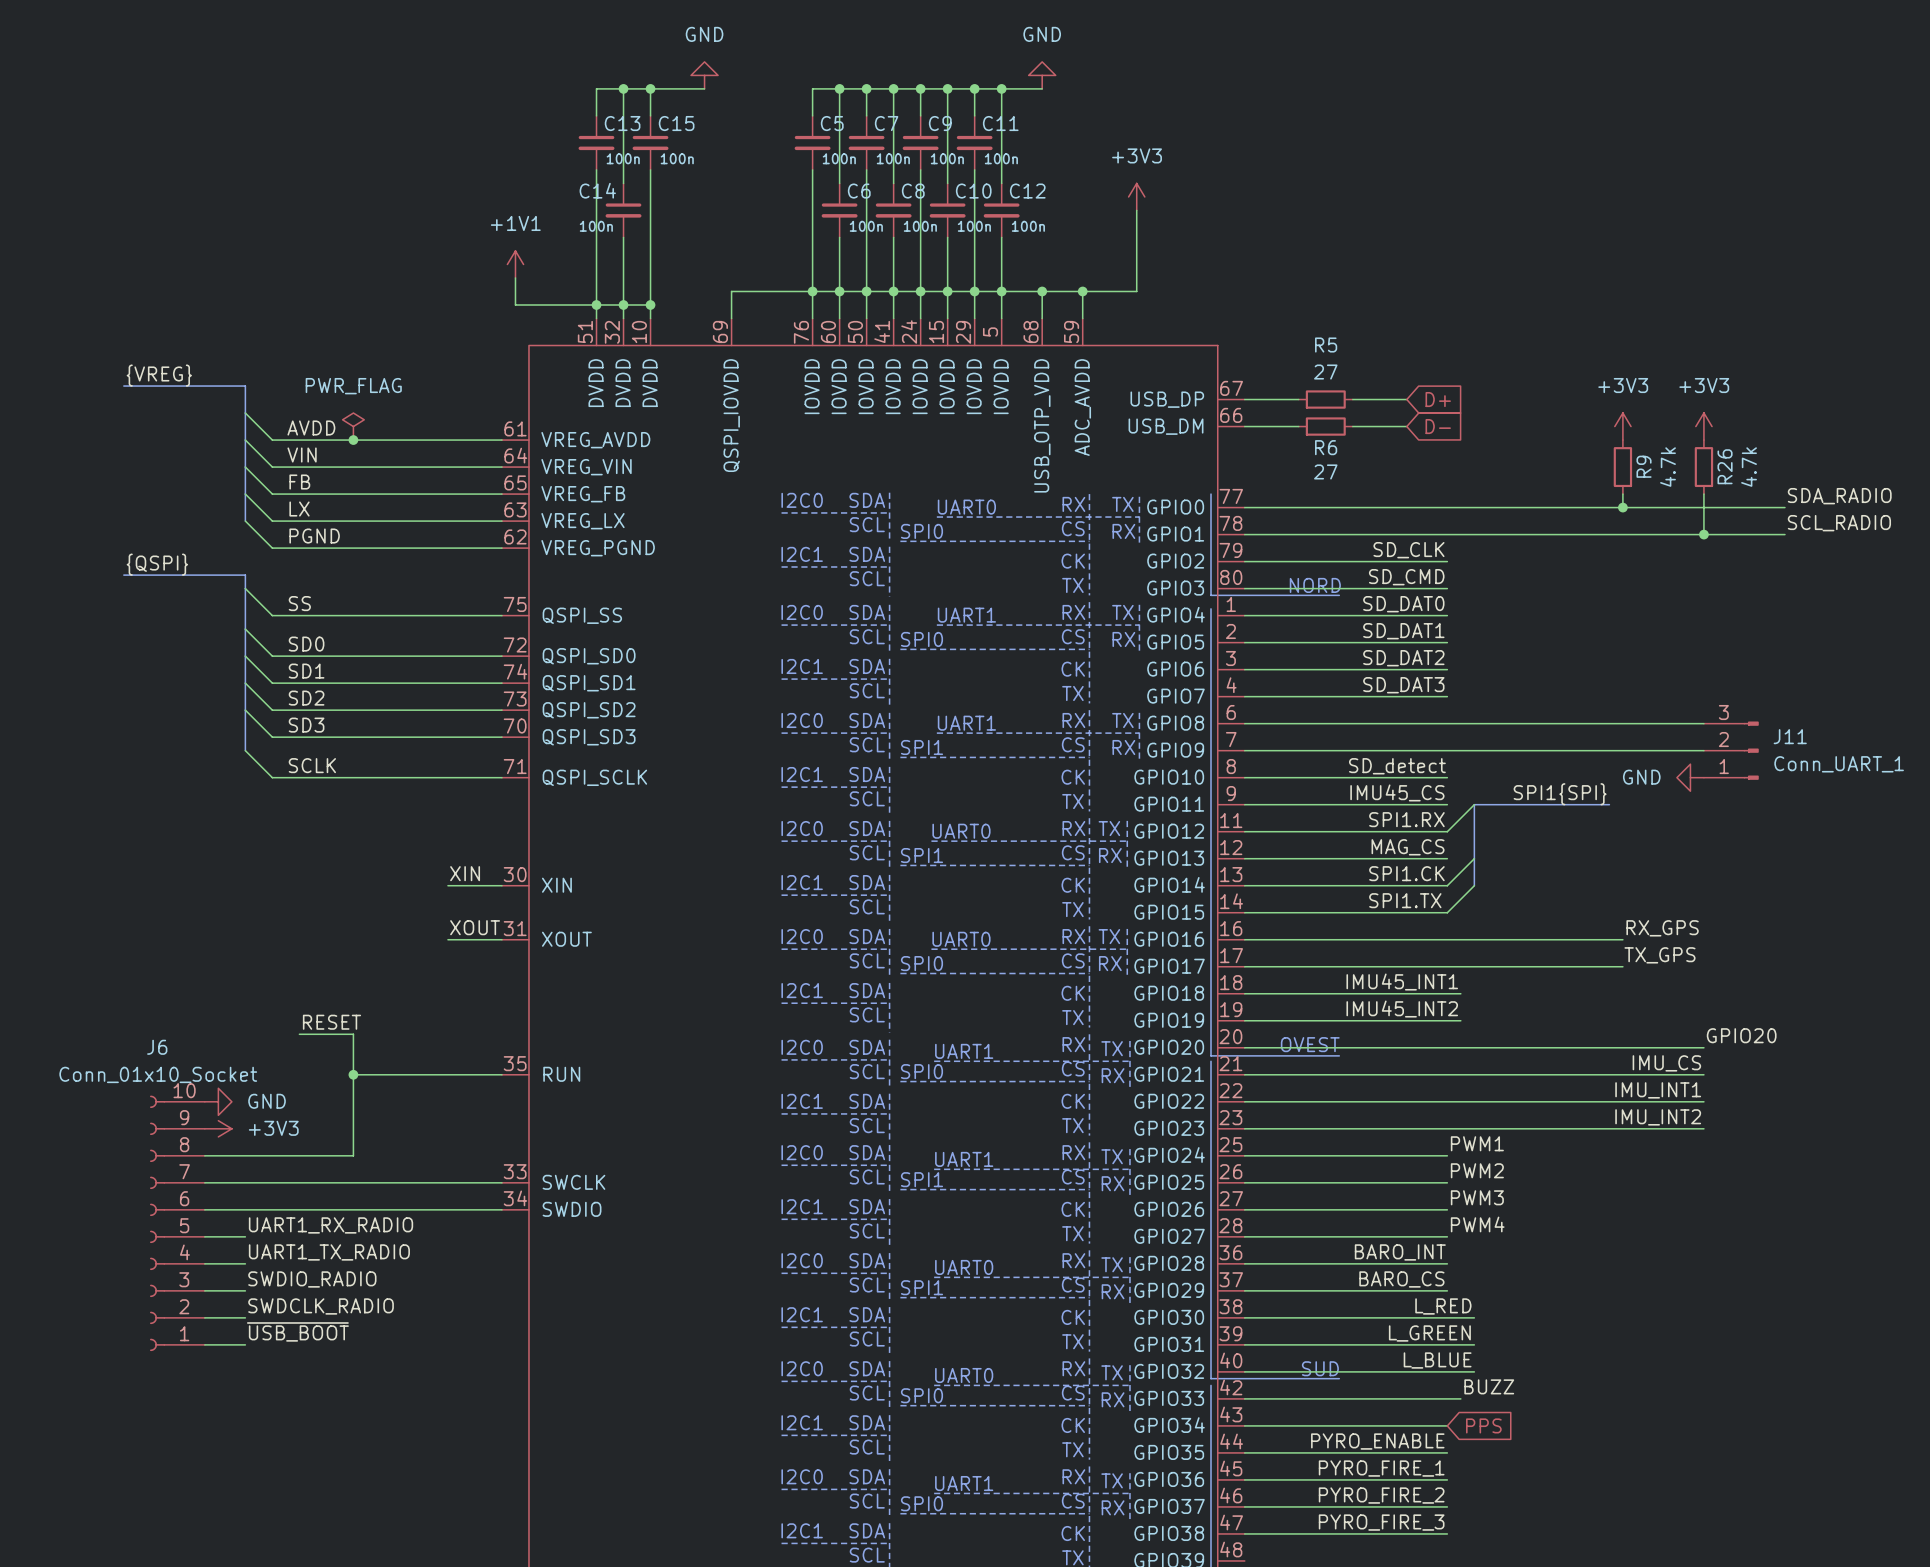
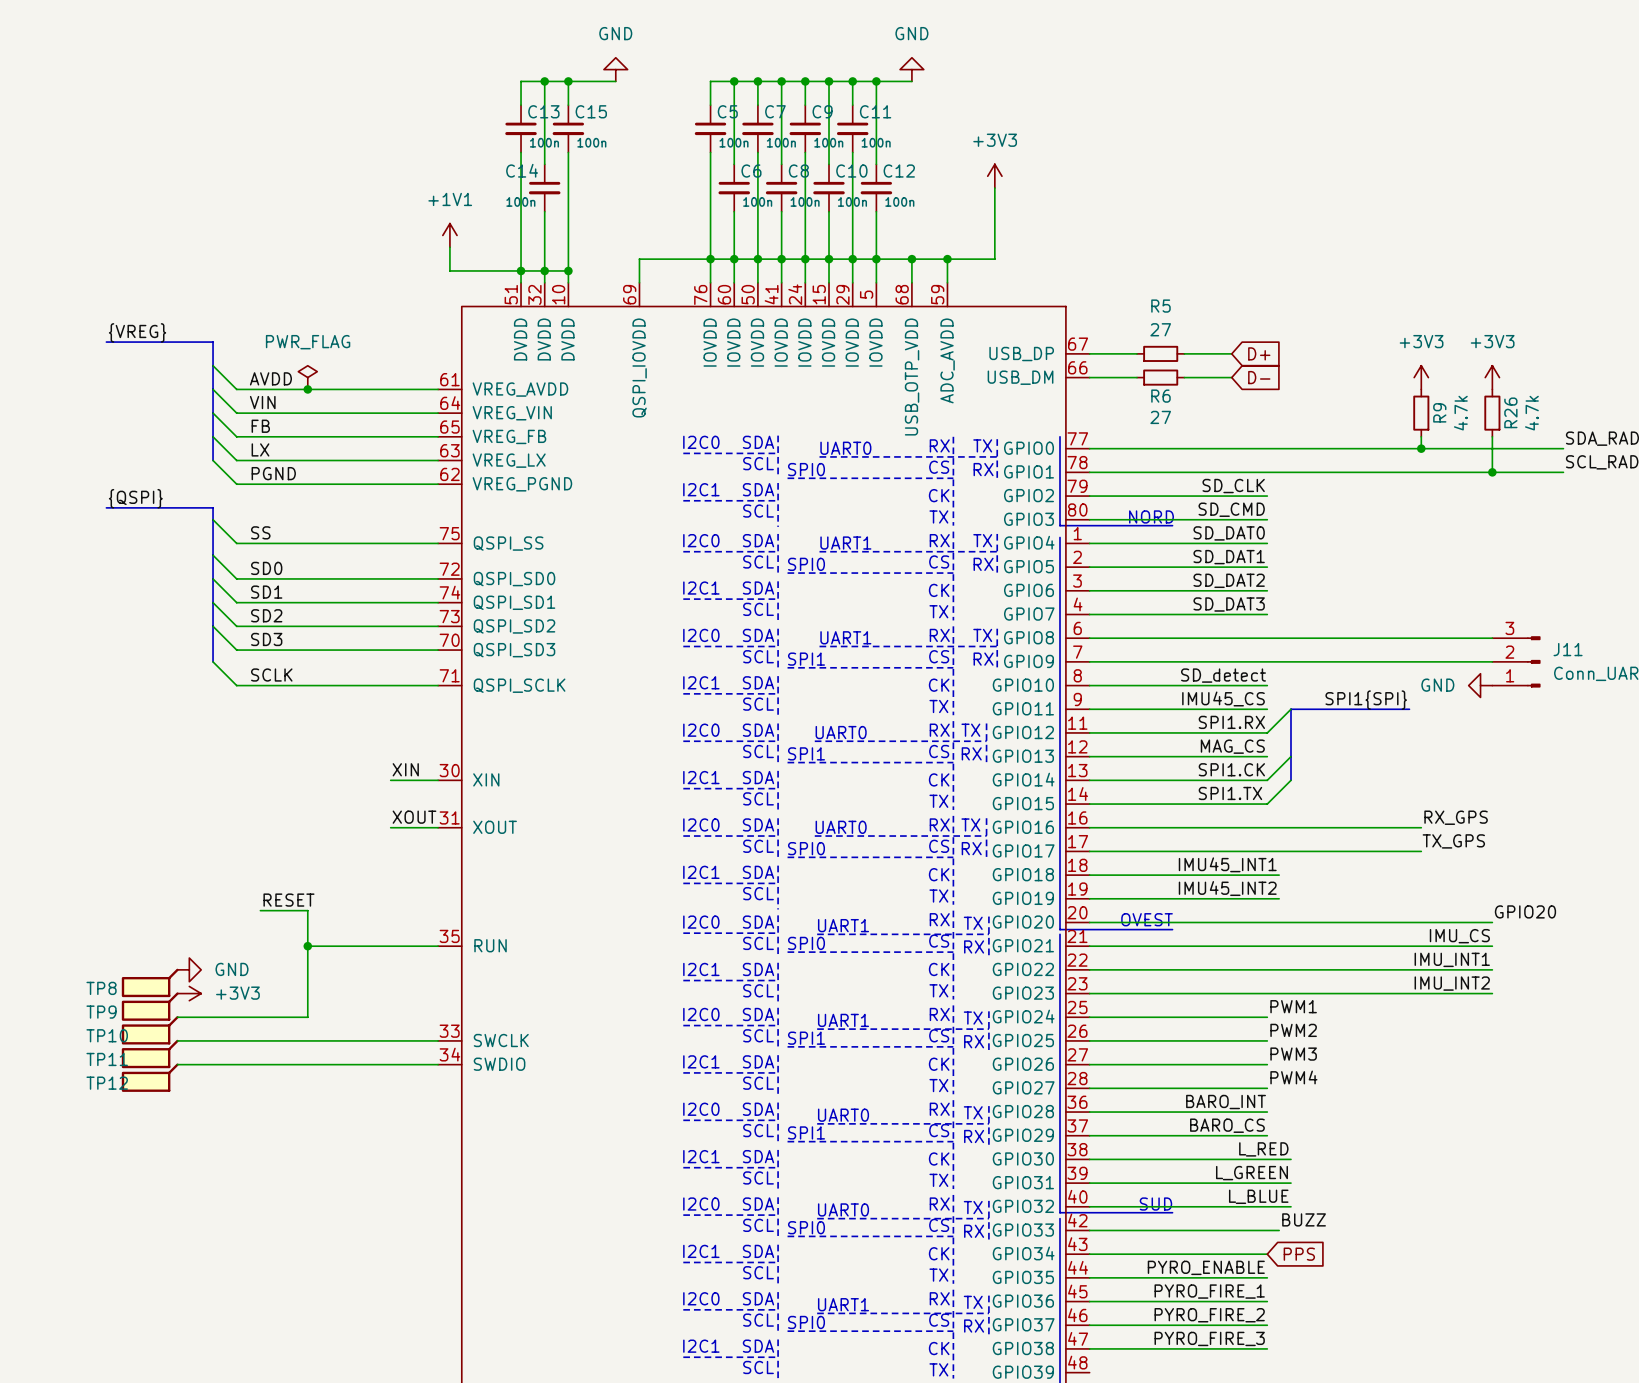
TP8: none -> (150, 982)
TP9: none -> (150, 1006)
TP10: none -> (150, 1030)
TP11: none -> (150, 1053)
J6: Conn_01x10_Socket (177, 1223) -> none
TP12: none -> (150, 1077)
label: UART1_RX_RADIO (331, 1225) -> none
wire: (204, 1236) (245, 1236) -> none
label: UART1_TX_RADIO (329, 1252) -> none
wire: (204, 1263) (245, 1263) -> none
label: SWDIO_RADIO (312, 1279) -> none
wire: (204, 1290) (245, 1290) -> none
label: SWDCLK_RADIO (321, 1306) -> none
wire: (204, 1317) (245, 1317) -> none
label: ~{USB_BOOT} (297, 1331) -> none
wire: (204, 1344) (245, 1344) -> none

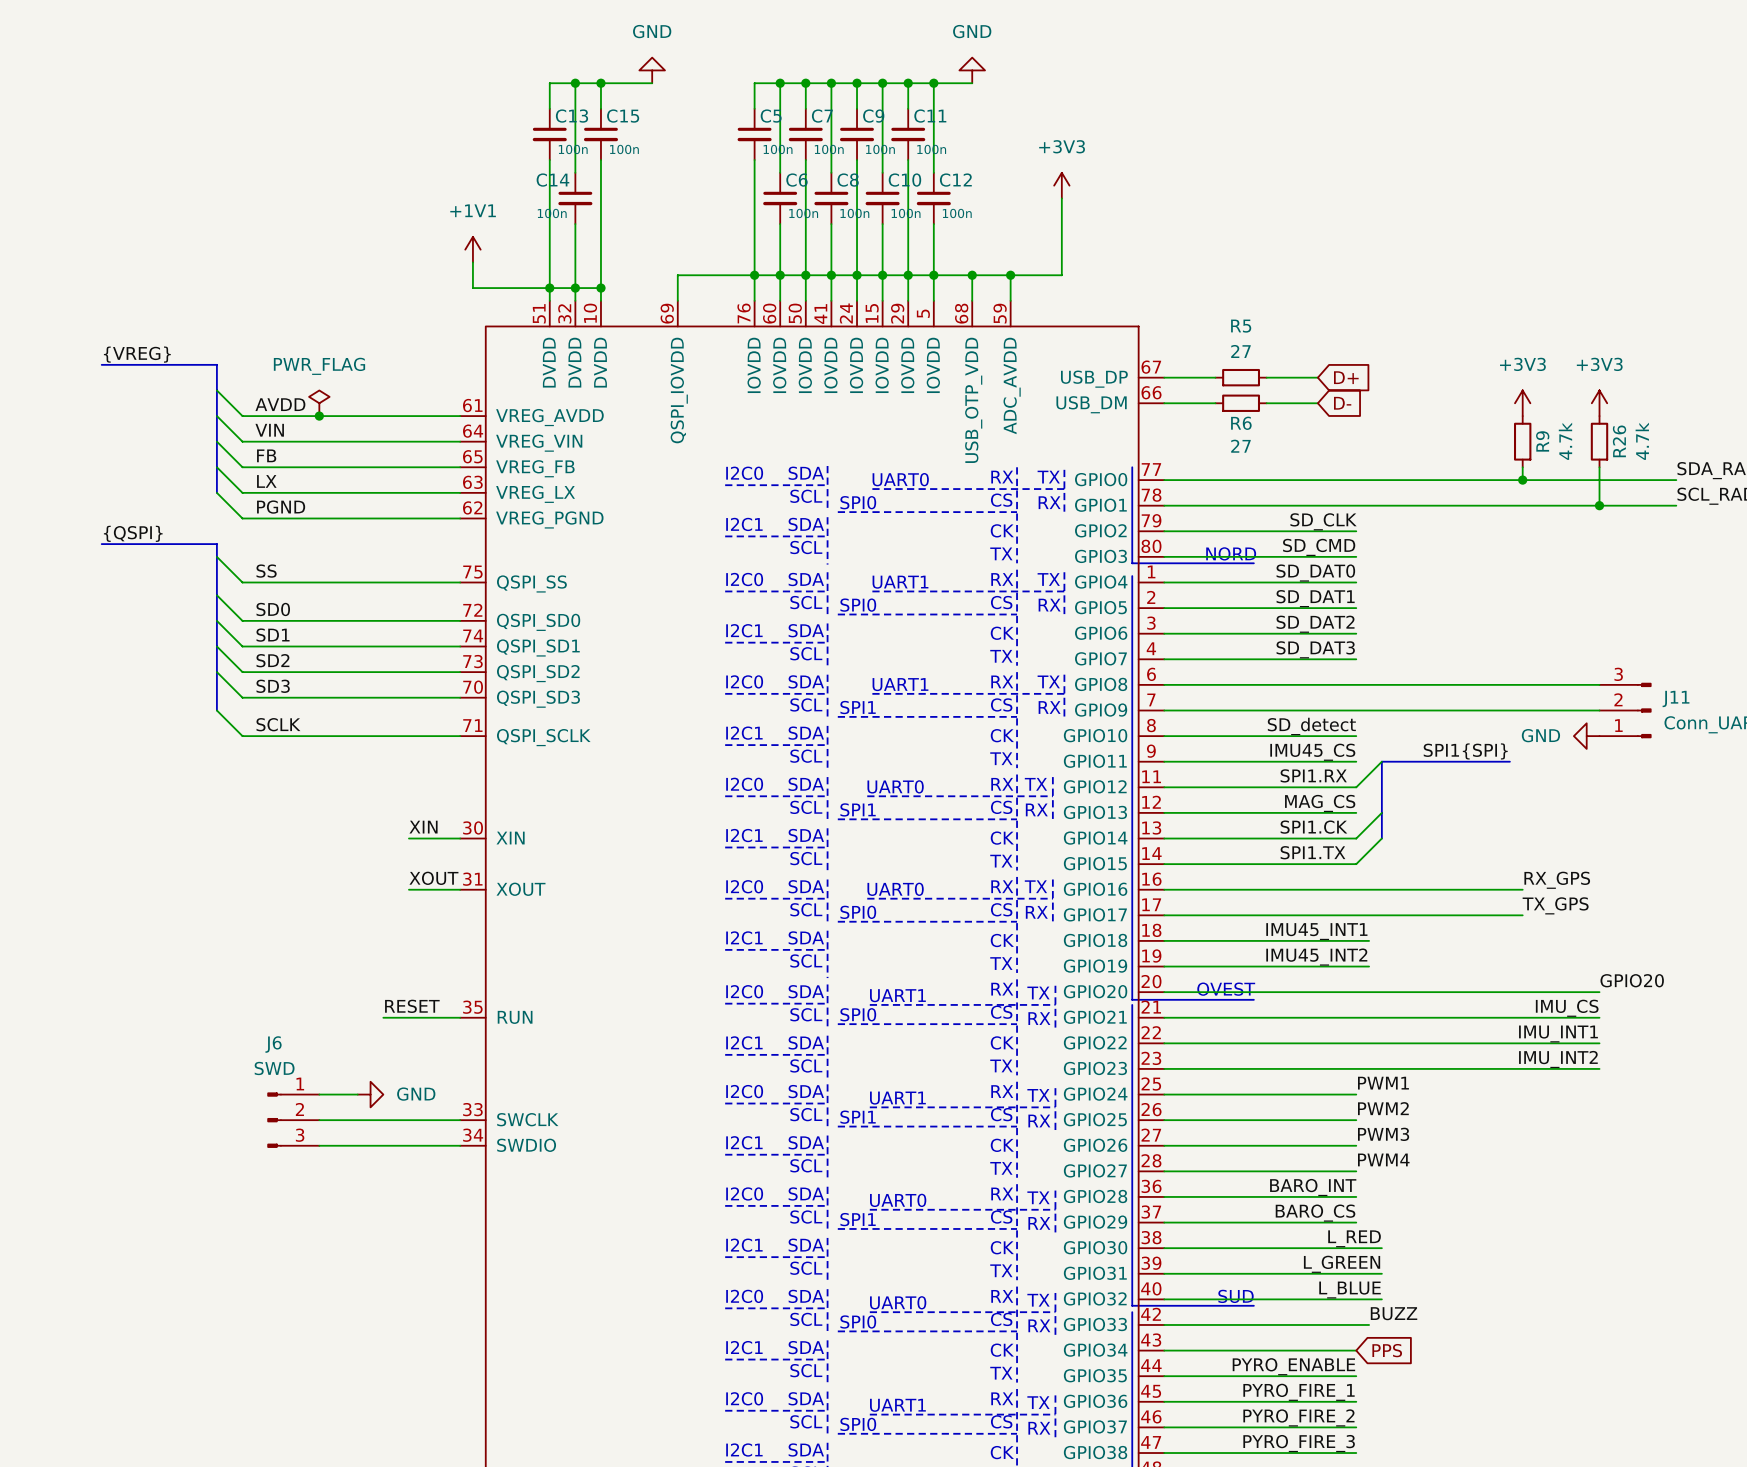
label position: RESET (288, 900) -> RESET (412, 1006)
wire: (260, 910) (307, 910) (307, 1017) (177, 1017) -> none
wire: (307, 946) (367, 946) -> none
junction: (307, 946) -> none
power symbol position: GND (189, 969) -> GND (370, 1094)
TP8: (150, 982) -> none
power symbol: +3V3 (189, 993) -> none
TP9: (150, 1006) -> none
wire: none -> (319, 1094) (357, 1094)
TP10: (150, 1030) -> none
wire: (177, 1040) (307, 1040) -> none
J6: none -> SWD (293, 1120)
TP11: (150, 1053) -> none
wire: (177, 1064) (307, 1064) -> none
TP12: (150, 1077) -> none

